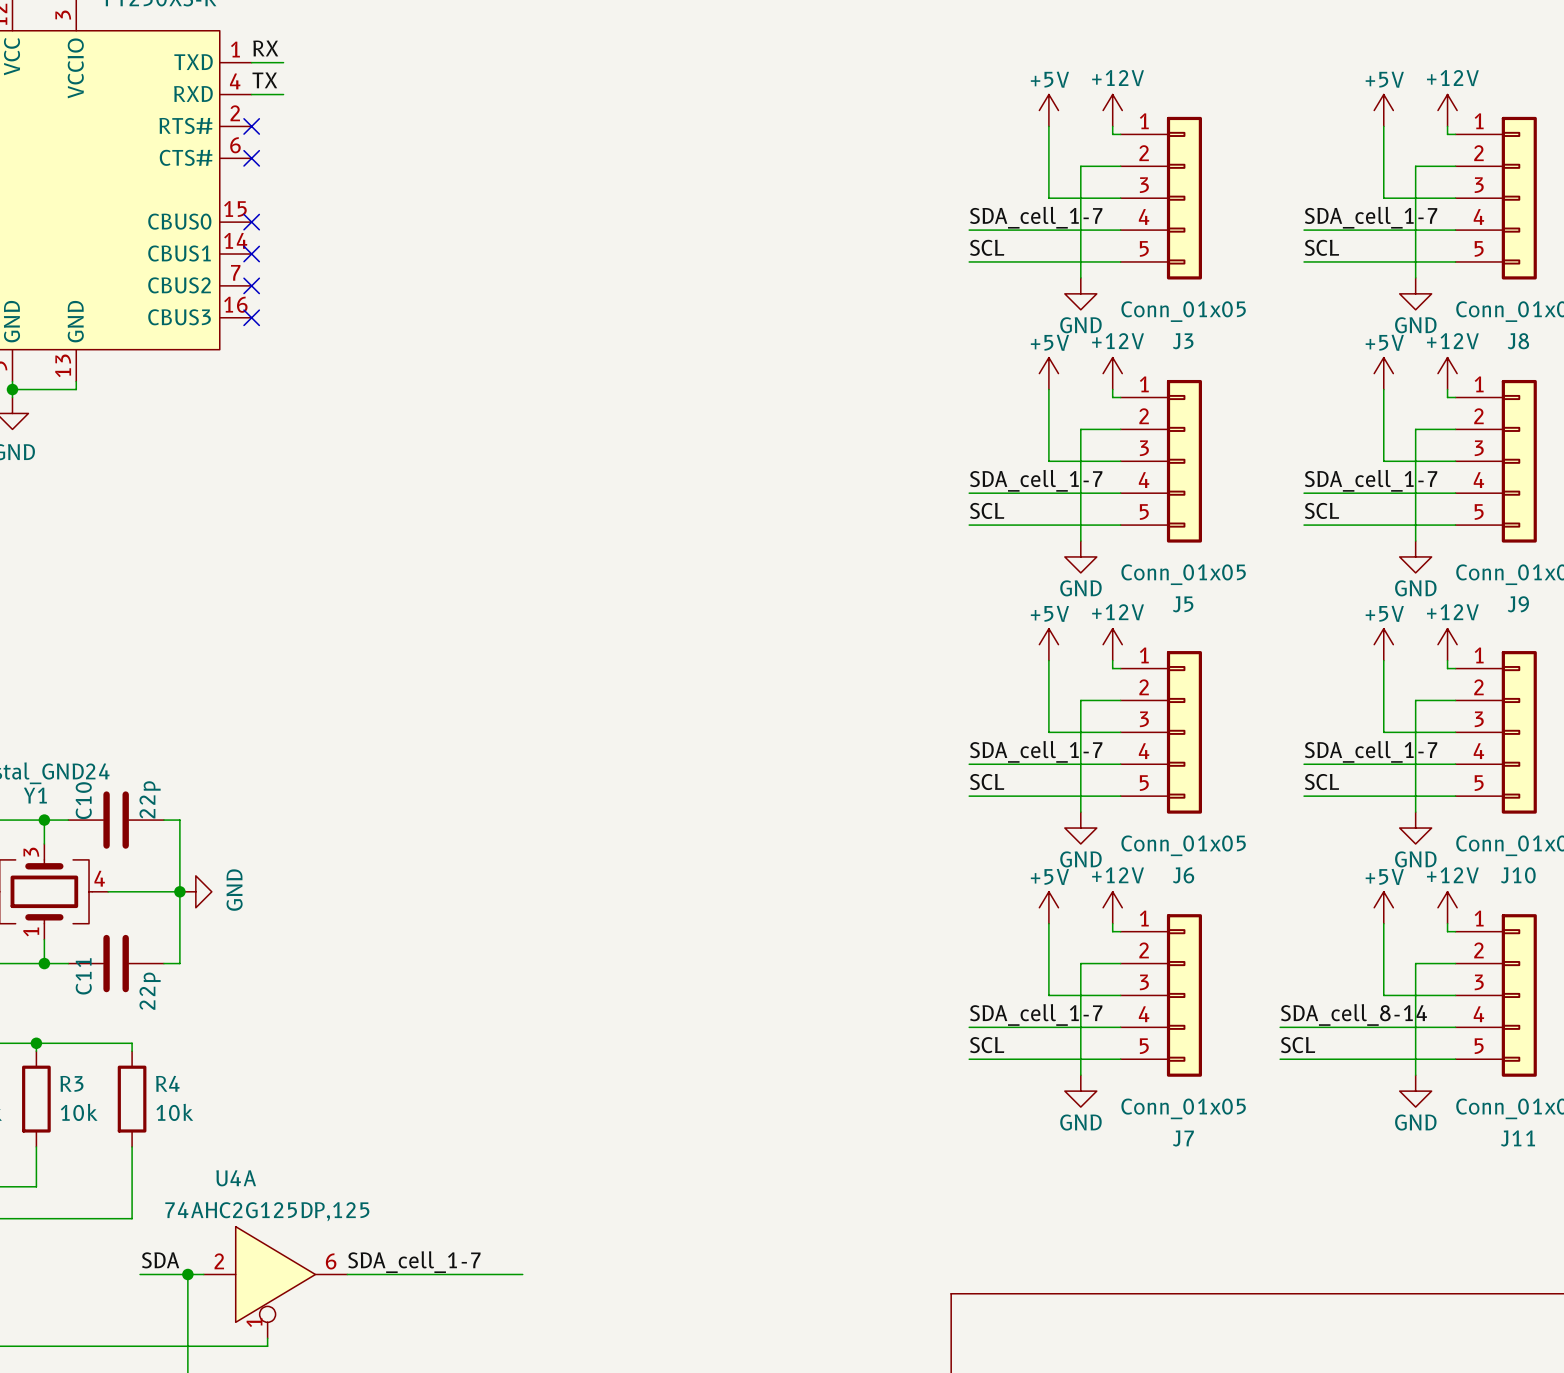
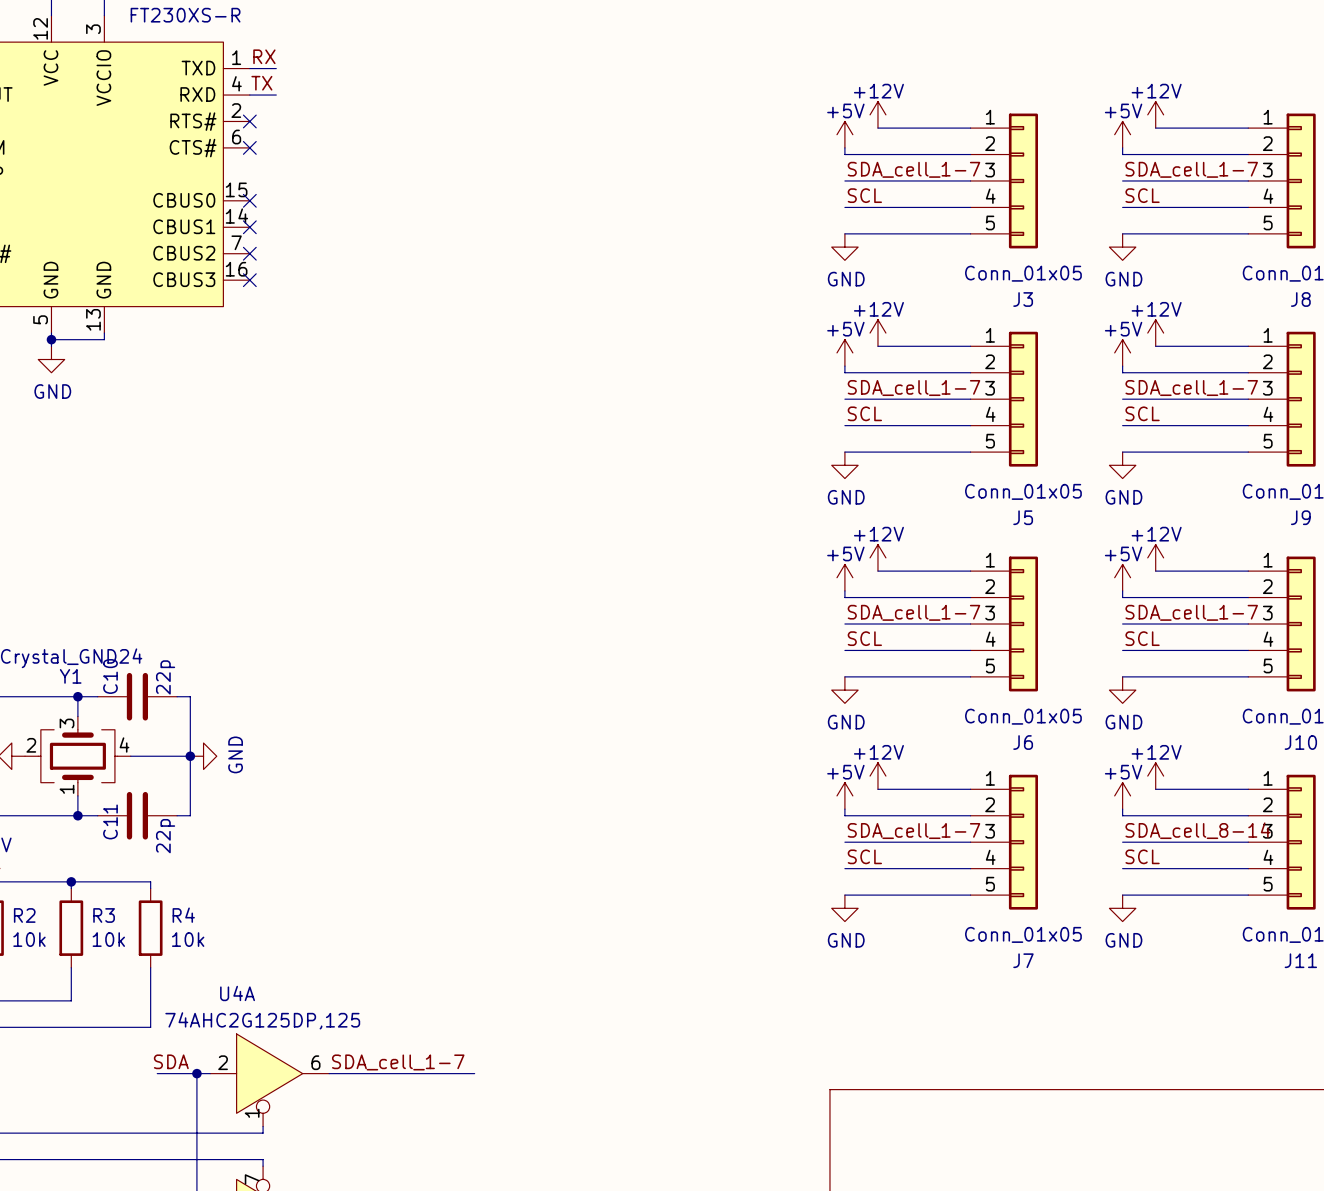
power symbol text position: +12V (1118, 78) -> +12V (878, 91)
power symbol text position: +12V (1452, 78) -> +12V (1156, 91)
power symbol text position: +5V (1049, 79) -> +5V (845, 110)
power symbol text position: +5V (1384, 79) -> +5V (1123, 110)
power symbol position: +5V (1048, 110) -> +5V (844, 134)
power symbol position: +12V (1112, 110) -> +12V (877, 114)
power symbol position: +5V (1383, 110) -> +5V (1122, 134)
power symbol position: +12V (1447, 110) -> +12V (1155, 114)
wire: (1048, 126) (1048, 198) -> (844, 180) (911, 180)
wire: (1112, 126) (1112, 134) -> (877, 128) (963, 128)
wire: (1383, 126) (1383, 198) -> (1122, 180) (1188, 180)
wire: (1447, 126) (1447, 134) -> (1155, 128) (1241, 128)
wire: (1080, 166) (1080, 277) -> (937, 154) (844, 154) (844, 147)
wire: (1415, 166) (1415, 277) -> (1215, 154) (1122, 154) (1122, 147)
label: none -> SDA_cell_1-7 (913, 169)
label: none -> SDA_cell_1-7 (1191, 169)
label: SDA_cell_1-7 (1036, 217) -> SCL (864, 195)
label: SDA_cell_1-7 (1371, 217) -> SCL (1142, 195)
label: SCL (987, 247) -> none
label: SCL (1321, 247) -> none
power symbol: none -> GND (844, 247)
power symbol: none -> GND (1122, 247)
power symbol: GND (1080, 293) -> none
power symbol: GND (1415, 293) -> none
power symbol text position: +12V (1118, 341) -> +12V (878, 309)
power symbol text position: +12V (1452, 341) -> +12V (1156, 309)
power symbol text position: +5V (1049, 342) -> +5V (845, 329)
power symbol text position: +5V (1384, 342) -> +5V (1123, 329)
power symbol position: +5V (1048, 373) -> +5V (844, 352)
power symbol position: +12V (1112, 373) -> +12V (877, 333)
power symbol position: +5V (1383, 373) -> +5V (1122, 352)
power symbol position: +12V (1447, 373) -> +12V (1155, 333)
wire: (1048, 389) (1048, 461) -> (844, 399) (911, 399)
wire: (1112, 389) (1112, 397) -> (877, 346) (963, 346)
wire: (1383, 389) (1383, 461) -> (1122, 399) (1188, 399)
wire: (1447, 389) (1447, 397) -> (1155, 346) (1241, 346)
wire: (1080, 429) (1080, 541) -> (937, 372) (844, 372) (844, 366)
wire: (1415, 429) (1415, 541) -> (1215, 372) (1122, 372) (1122, 366)
label: none -> SDA_cell_1-7 (913, 388)
label: none -> SDA_cell_1-7 (1191, 388)
label: SDA_cell_1-7 (1036, 480) -> SCL (864, 413)
label: SDA_cell_1-7 (1371, 480) -> SCL (1142, 413)
label: SCL (987, 510) -> none
label: SCL (1321, 510) -> none
power symbol: none -> GND (844, 465)
power symbol: none -> GND (1122, 465)
power symbol: GND (1080, 556) -> none
power symbol: GND (1415, 556) -> none
power symbol text position: +12V (1118, 612) -> +12V (878, 534)
power symbol text position: +12V (1452, 612) -> +12V (1156, 534)
power symbol text position: +5V (1049, 613) -> +5V (845, 553)
power symbol text position: +5V (1384, 613) -> +5V (1123, 553)
power symbol position: +5V (1048, 644) -> +5V (844, 577)
power symbol position: +12V (1112, 644) -> +12V (877, 557)
power symbol position: +5V (1383, 644) -> +5V (1122, 577)
power symbol position: +12V (1447, 644) -> +12V (1155, 557)
wire: (1048, 660) (1048, 732) -> (844, 623) (911, 623)
wire: (1112, 660) (1112, 668) -> (877, 571) (963, 571)
wire: (1383, 660) (1383, 732) -> (1122, 623) (1188, 623)
wire: (1447, 660) (1447, 668) -> (1155, 571) (1241, 571)
wire: (1080, 700) (1080, 812) -> (937, 597) (844, 597) (844, 590)
wire: (1415, 700) (1415, 812) -> (1215, 597) (1122, 597) (1122, 590)
label: none -> SDA_cell_1-7 (913, 612)
label: none -> SDA_cell_1-7 (1191, 612)
label: SDA_cell_1-7 (1036, 751) -> SCL (864, 638)
label: SDA_cell_1-7 (1371, 751) -> SCL (1142, 638)
label: SCL (987, 782) -> none
label: SCL (1321, 782) -> none
power symbol: none -> GND (844, 690)
power symbol: none -> GND (1122, 690)
power symbol: GND (1080, 828) -> none
power symbol: GND (1415, 828) -> none
power symbol text position: +12V (1118, 875) -> +12V (878, 752)
power symbol text position: +12V (1452, 875) -> +12V (1156, 752)
power symbol text position: +5V (1049, 876) -> +5V (845, 772)
power symbol text position: +5V (1384, 876) -> +5V (1123, 772)
power symbol position: +5V (1048, 907) -> +5V (844, 795)
power symbol position: +12V (1112, 907) -> +12V (877, 776)
power symbol position: +5V (1383, 907) -> +5V (1122, 795)
power symbol position: +12V (1447, 907) -> +12V (1155, 776)
wire: (1048, 923) (1048, 995) -> (844, 842) (911, 842)
wire: (1112, 923) (1112, 931) -> (877, 789) (963, 789)
wire: (1383, 923) (1383, 995) -> (1122, 842) (1188, 842)
wire: (1447, 923) (1447, 931) -> (1155, 789) (1241, 789)
wire: (1080, 963) (1080, 1075) -> (937, 815) (844, 815) (844, 809)
wire: (1415, 963) (1415, 1075) -> (1215, 815) (1122, 815) (1122, 809)
label: none -> SDA_cell_1-7 (913, 831)
label: SDA_cell_1-7 (1036, 1014) -> SCL (864, 856)
label position: SDA_cell_8-14 (1353, 1014) -> SDA_cell_8-14 (1197, 830)
wire: (1280, 1027) (1304, 1027) -> none
label: SCL (987, 1045) -> none
label position: SCL (1298, 1045) -> SCL (1142, 856)
wire: (1280, 1059) (1304, 1059) -> none
power symbol: none -> GND (844, 908)
power symbol: none -> GND (1122, 908)
power symbol: GND (1080, 1091) -> none
power symbol: GND (1415, 1091) -> none

